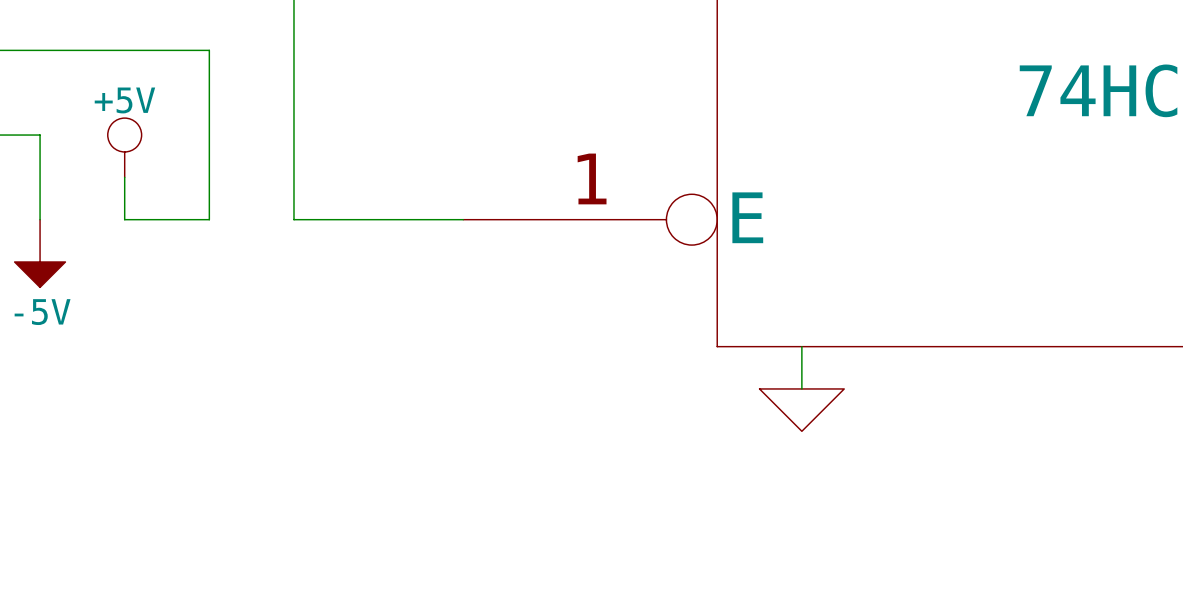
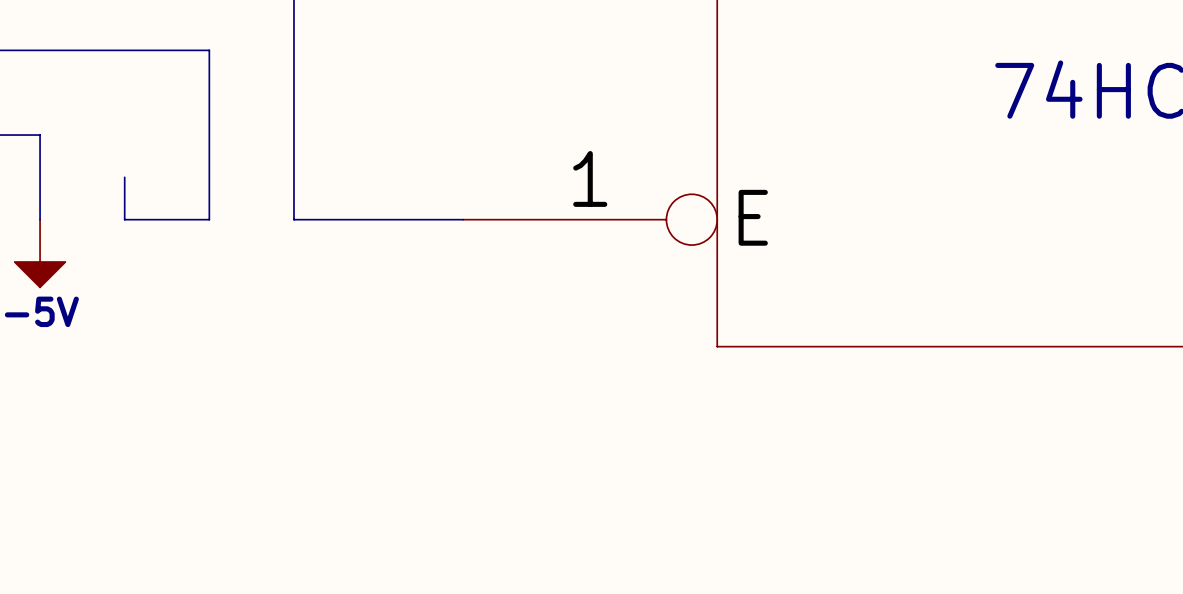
power symbol: +5V (124, 147) -> none
wire: (801, 346) (801, 388) -> none
power symbol: (801, 410) -> none

